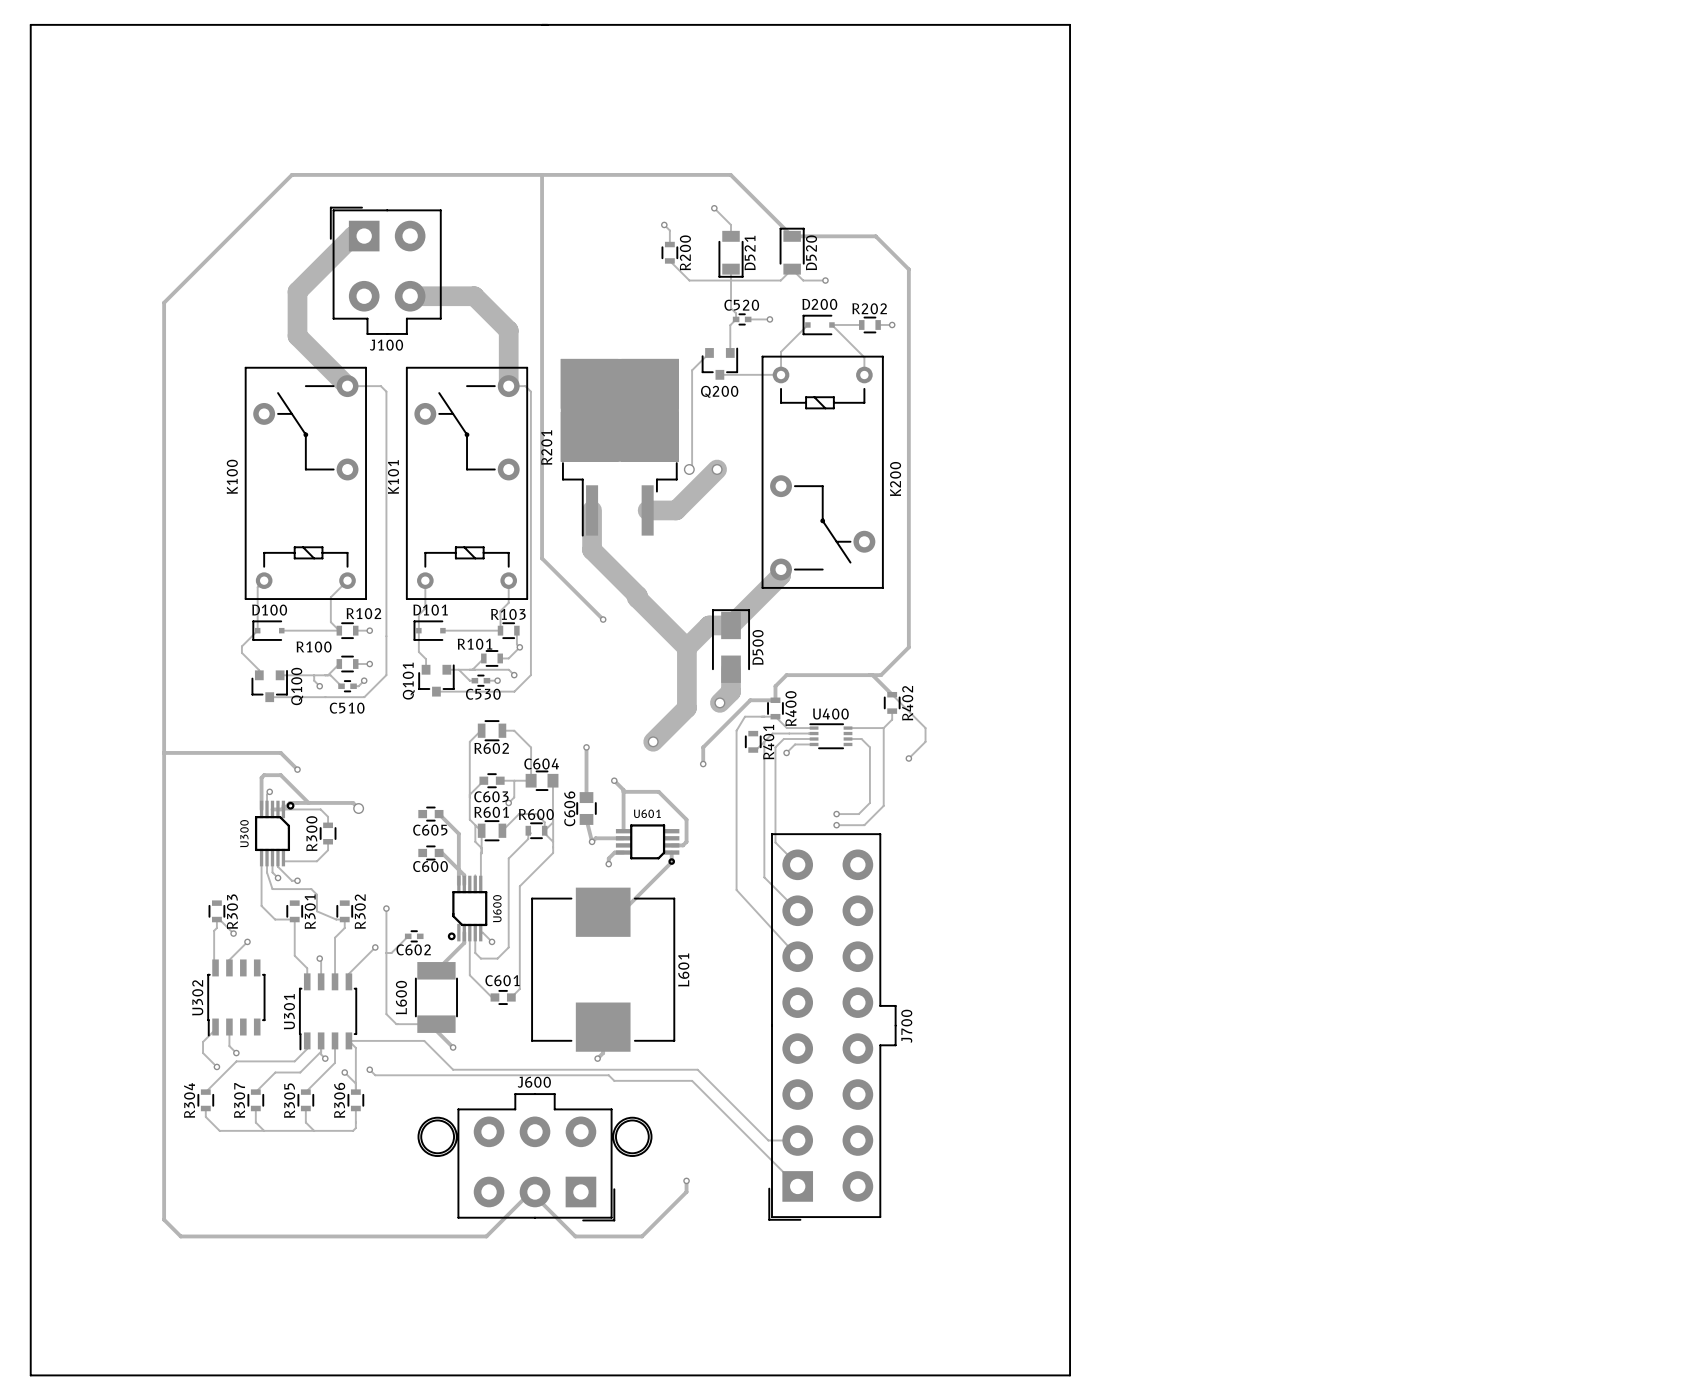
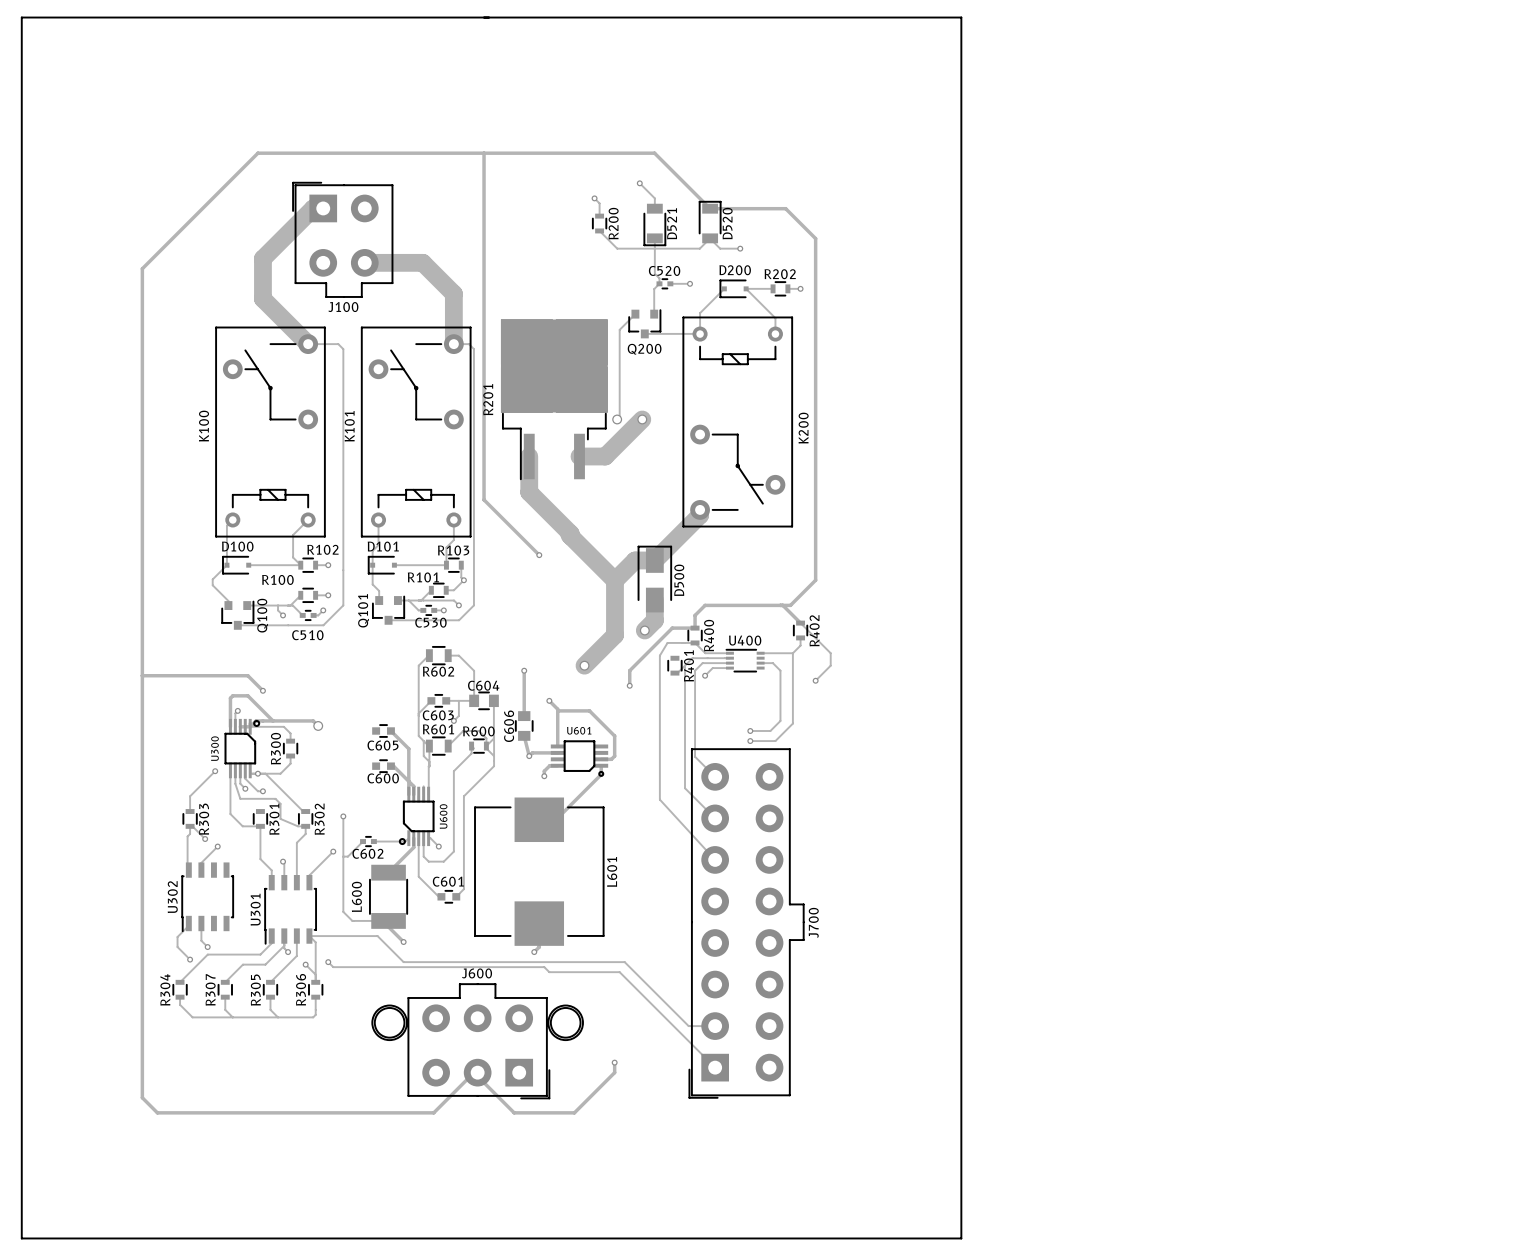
track: none -> (215, 771) (190, 796) (190, 811)
via: none -> (215, 771)
via: none -> (257, 773)
track: none -> (265, 773) (303, 811) (305, 811)
track: none -> (408, 838) (405, 841) (373, 841)

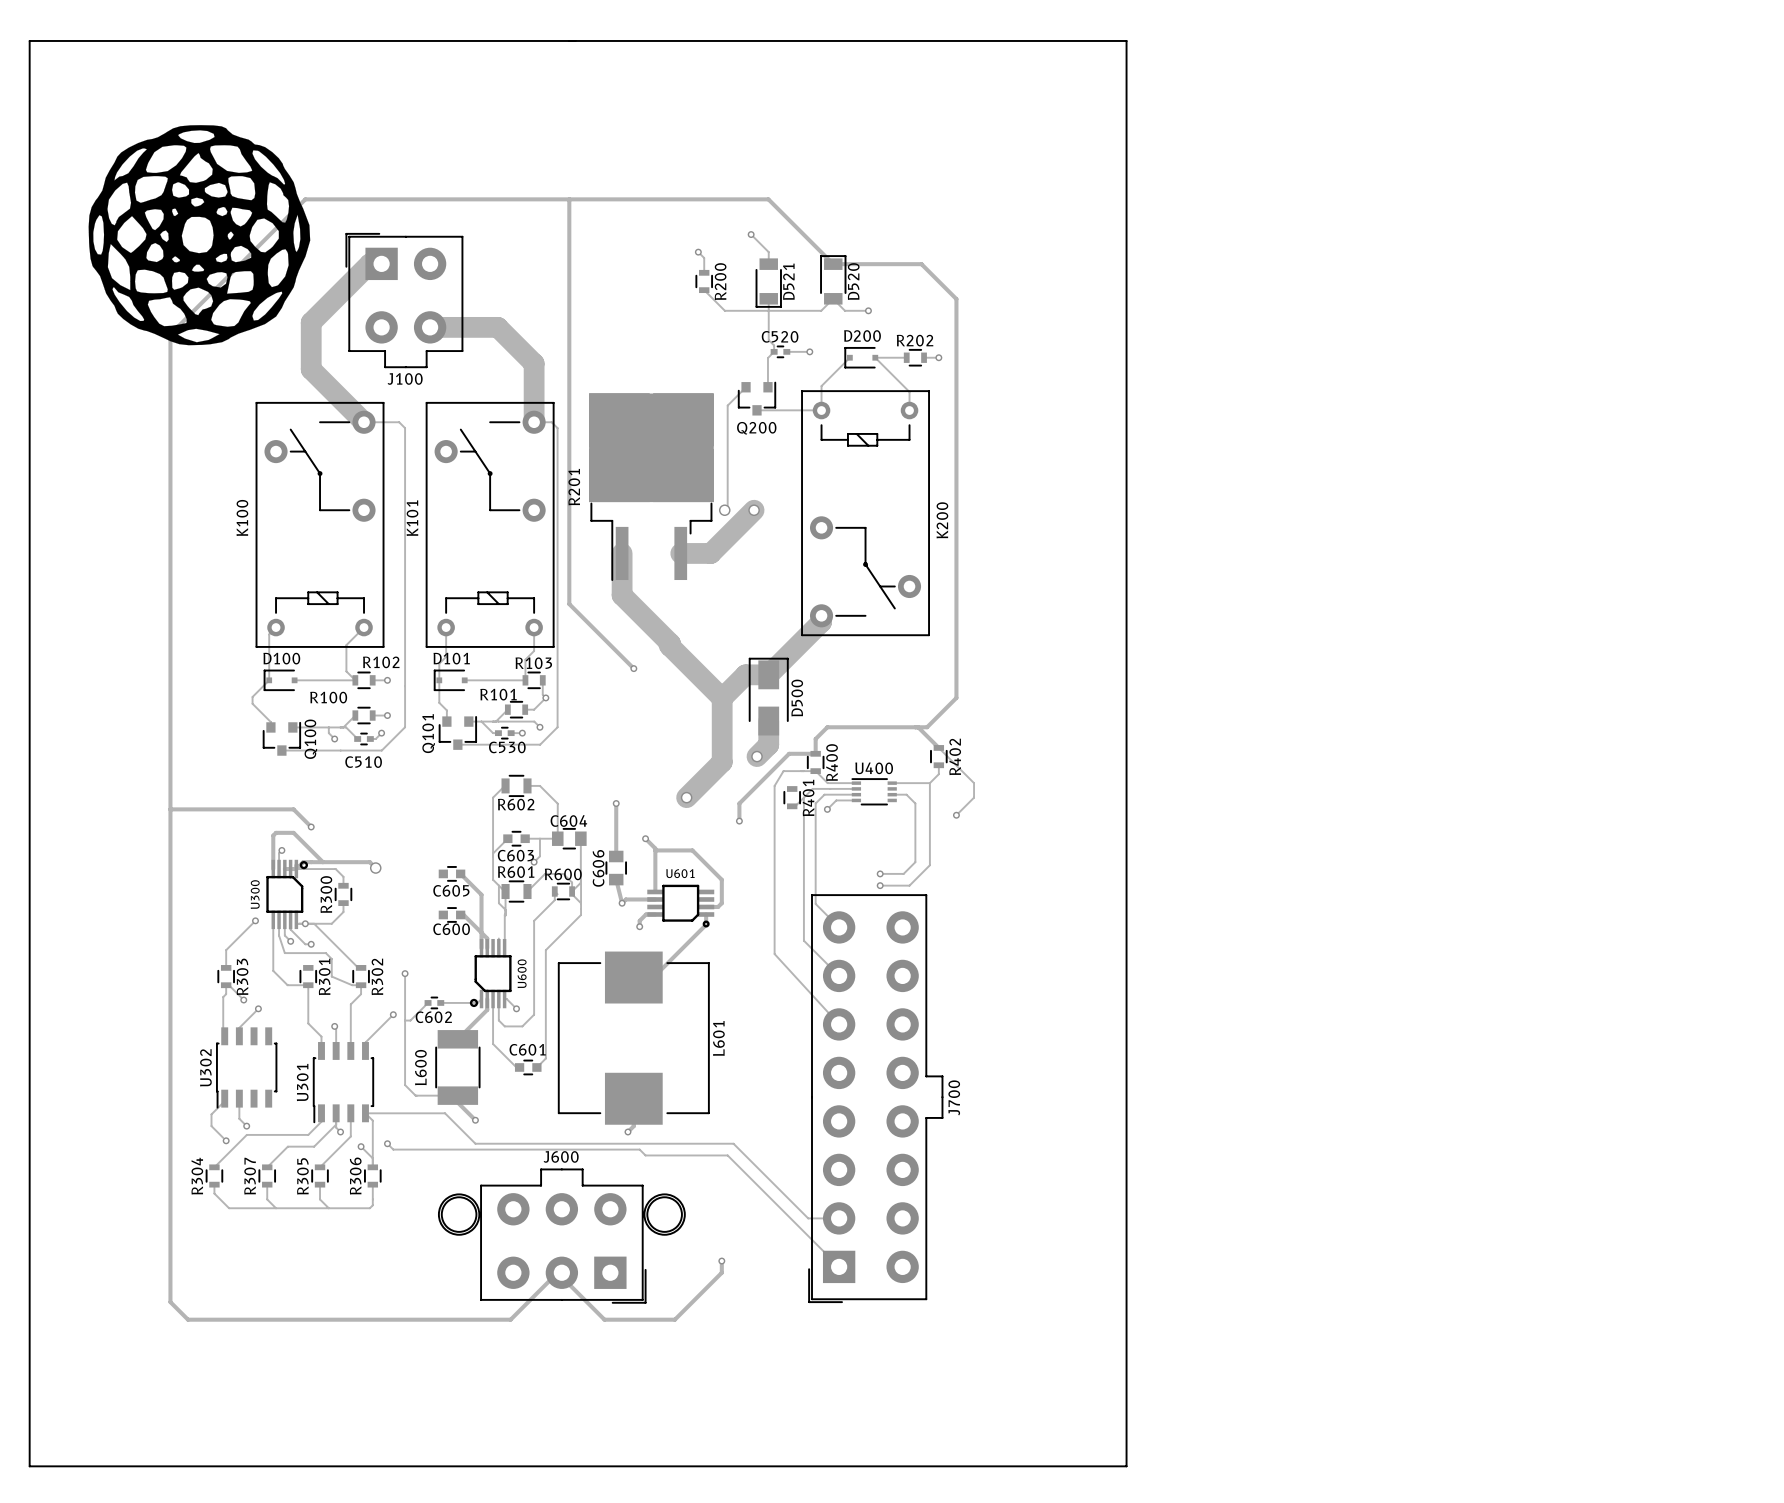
drawing: none -> [88, 125, 311, 346]

